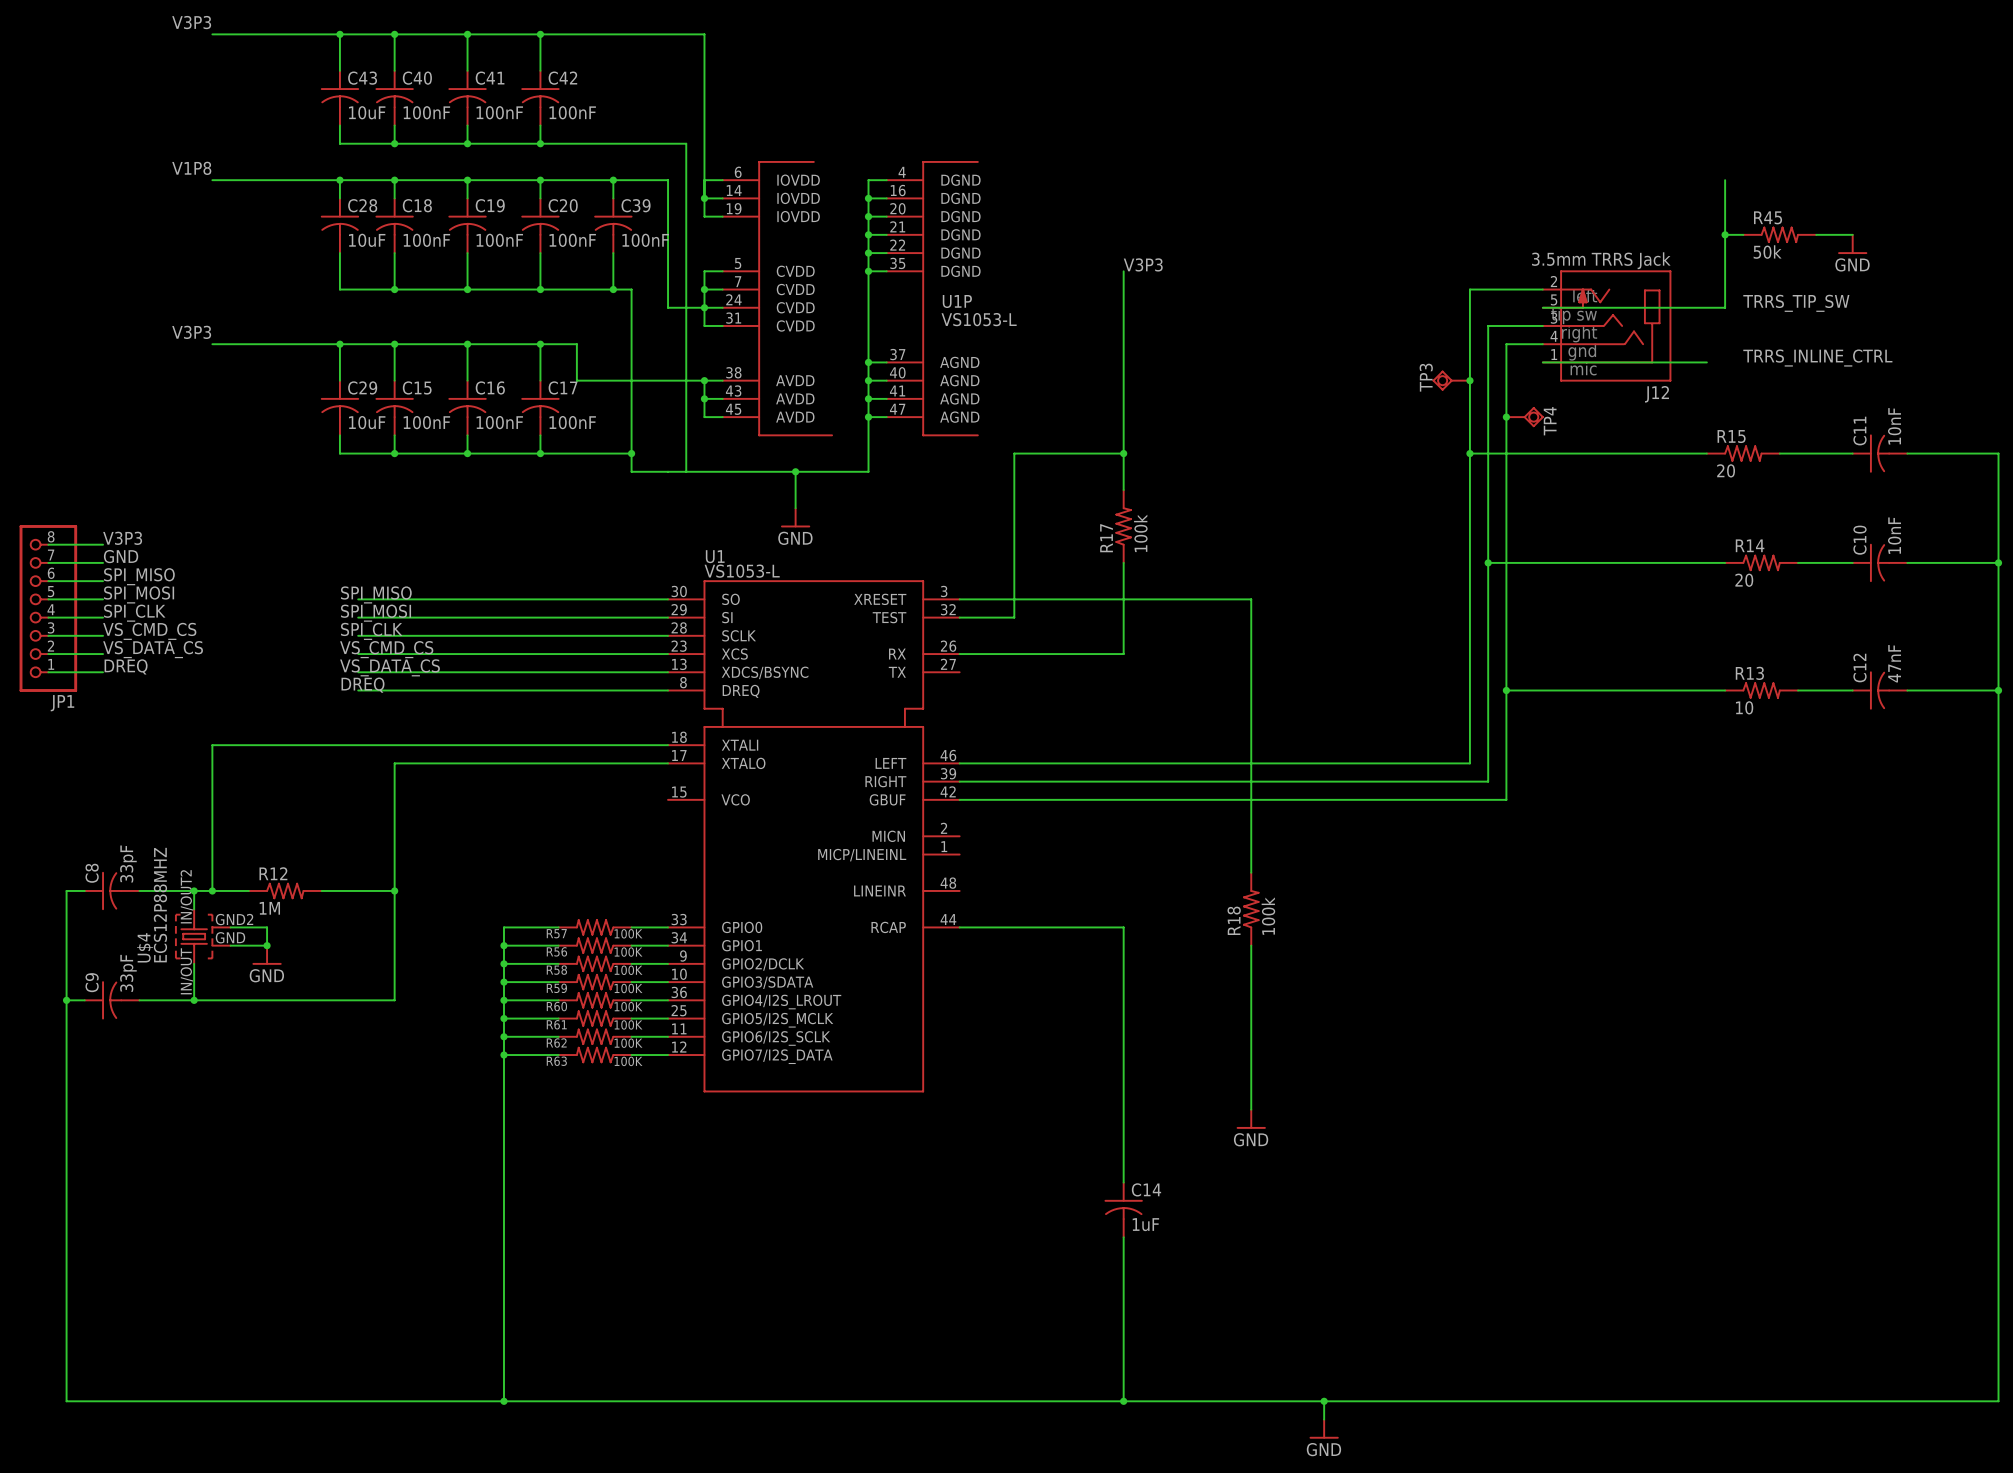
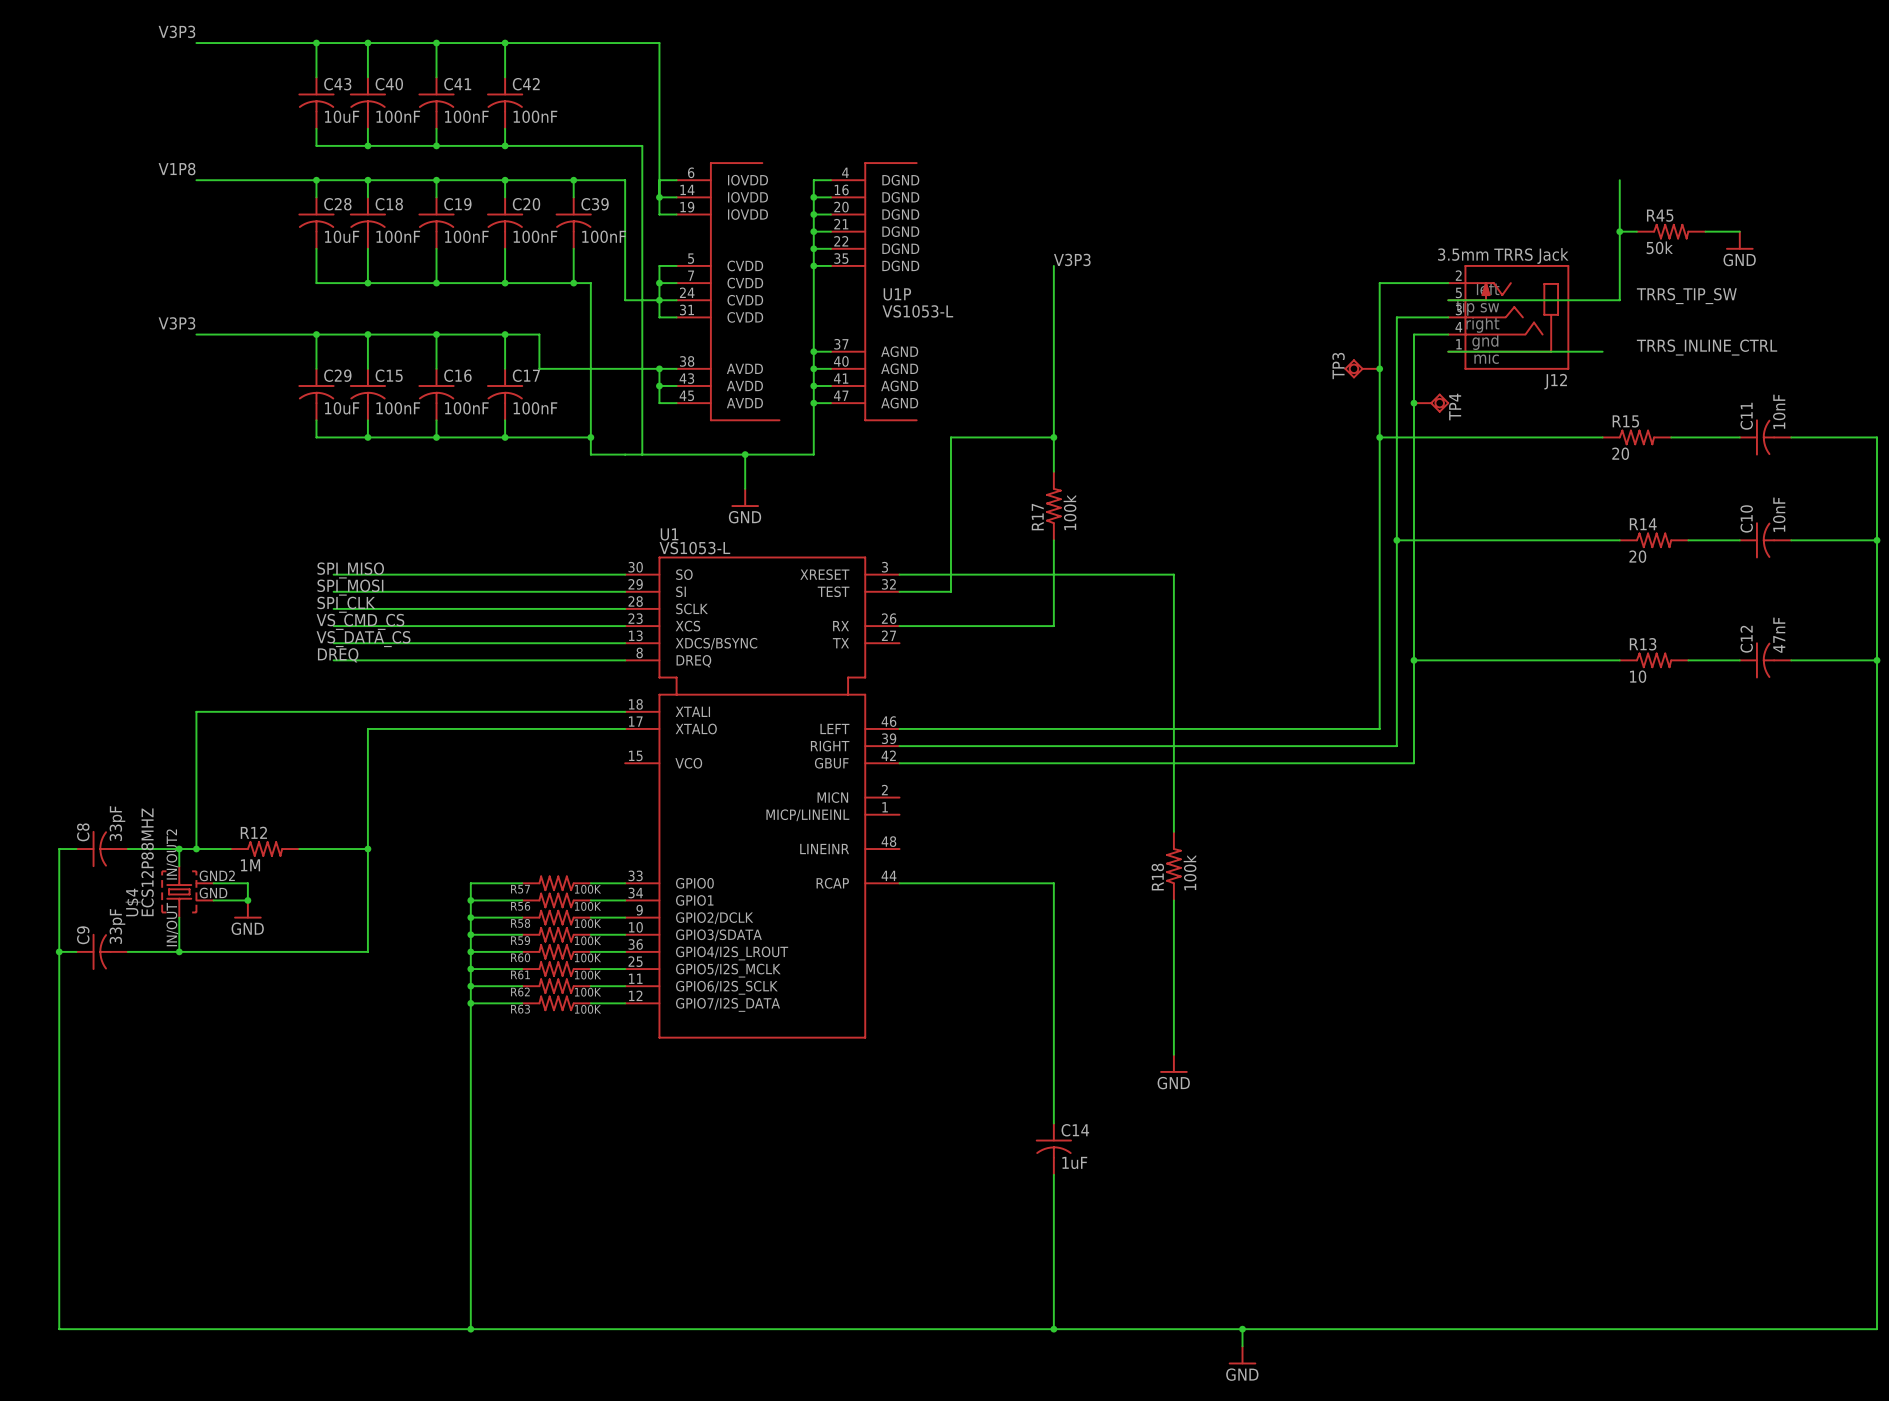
label: V3P3 (122, 538) -> none
wire: (48, 544) (103, 544) -> none
label: GND (121, 556) -> none
wire: (48, 562) (103, 562) -> none
label: SPI_MISO (139, 576) -> none
wire: (48, 581) (103, 581) -> none
label: SPI_MOSI (139, 594) -> none
wire: (48, 599) (103, 599) -> none
JP1: (48, 608) -> none
label: SPI_CLK (134, 613) -> none
wire: (48, 617) (103, 617) -> none
label: VS_CMD_CS (149, 631) -> none
wire: (48, 635) (103, 635) -> none
label: VS_DATA_CS (153, 649) -> none
wire: (48, 654) (103, 654) -> none
label: DREQ (126, 666) -> none
wire: (48, 672) (103, 672) -> none

